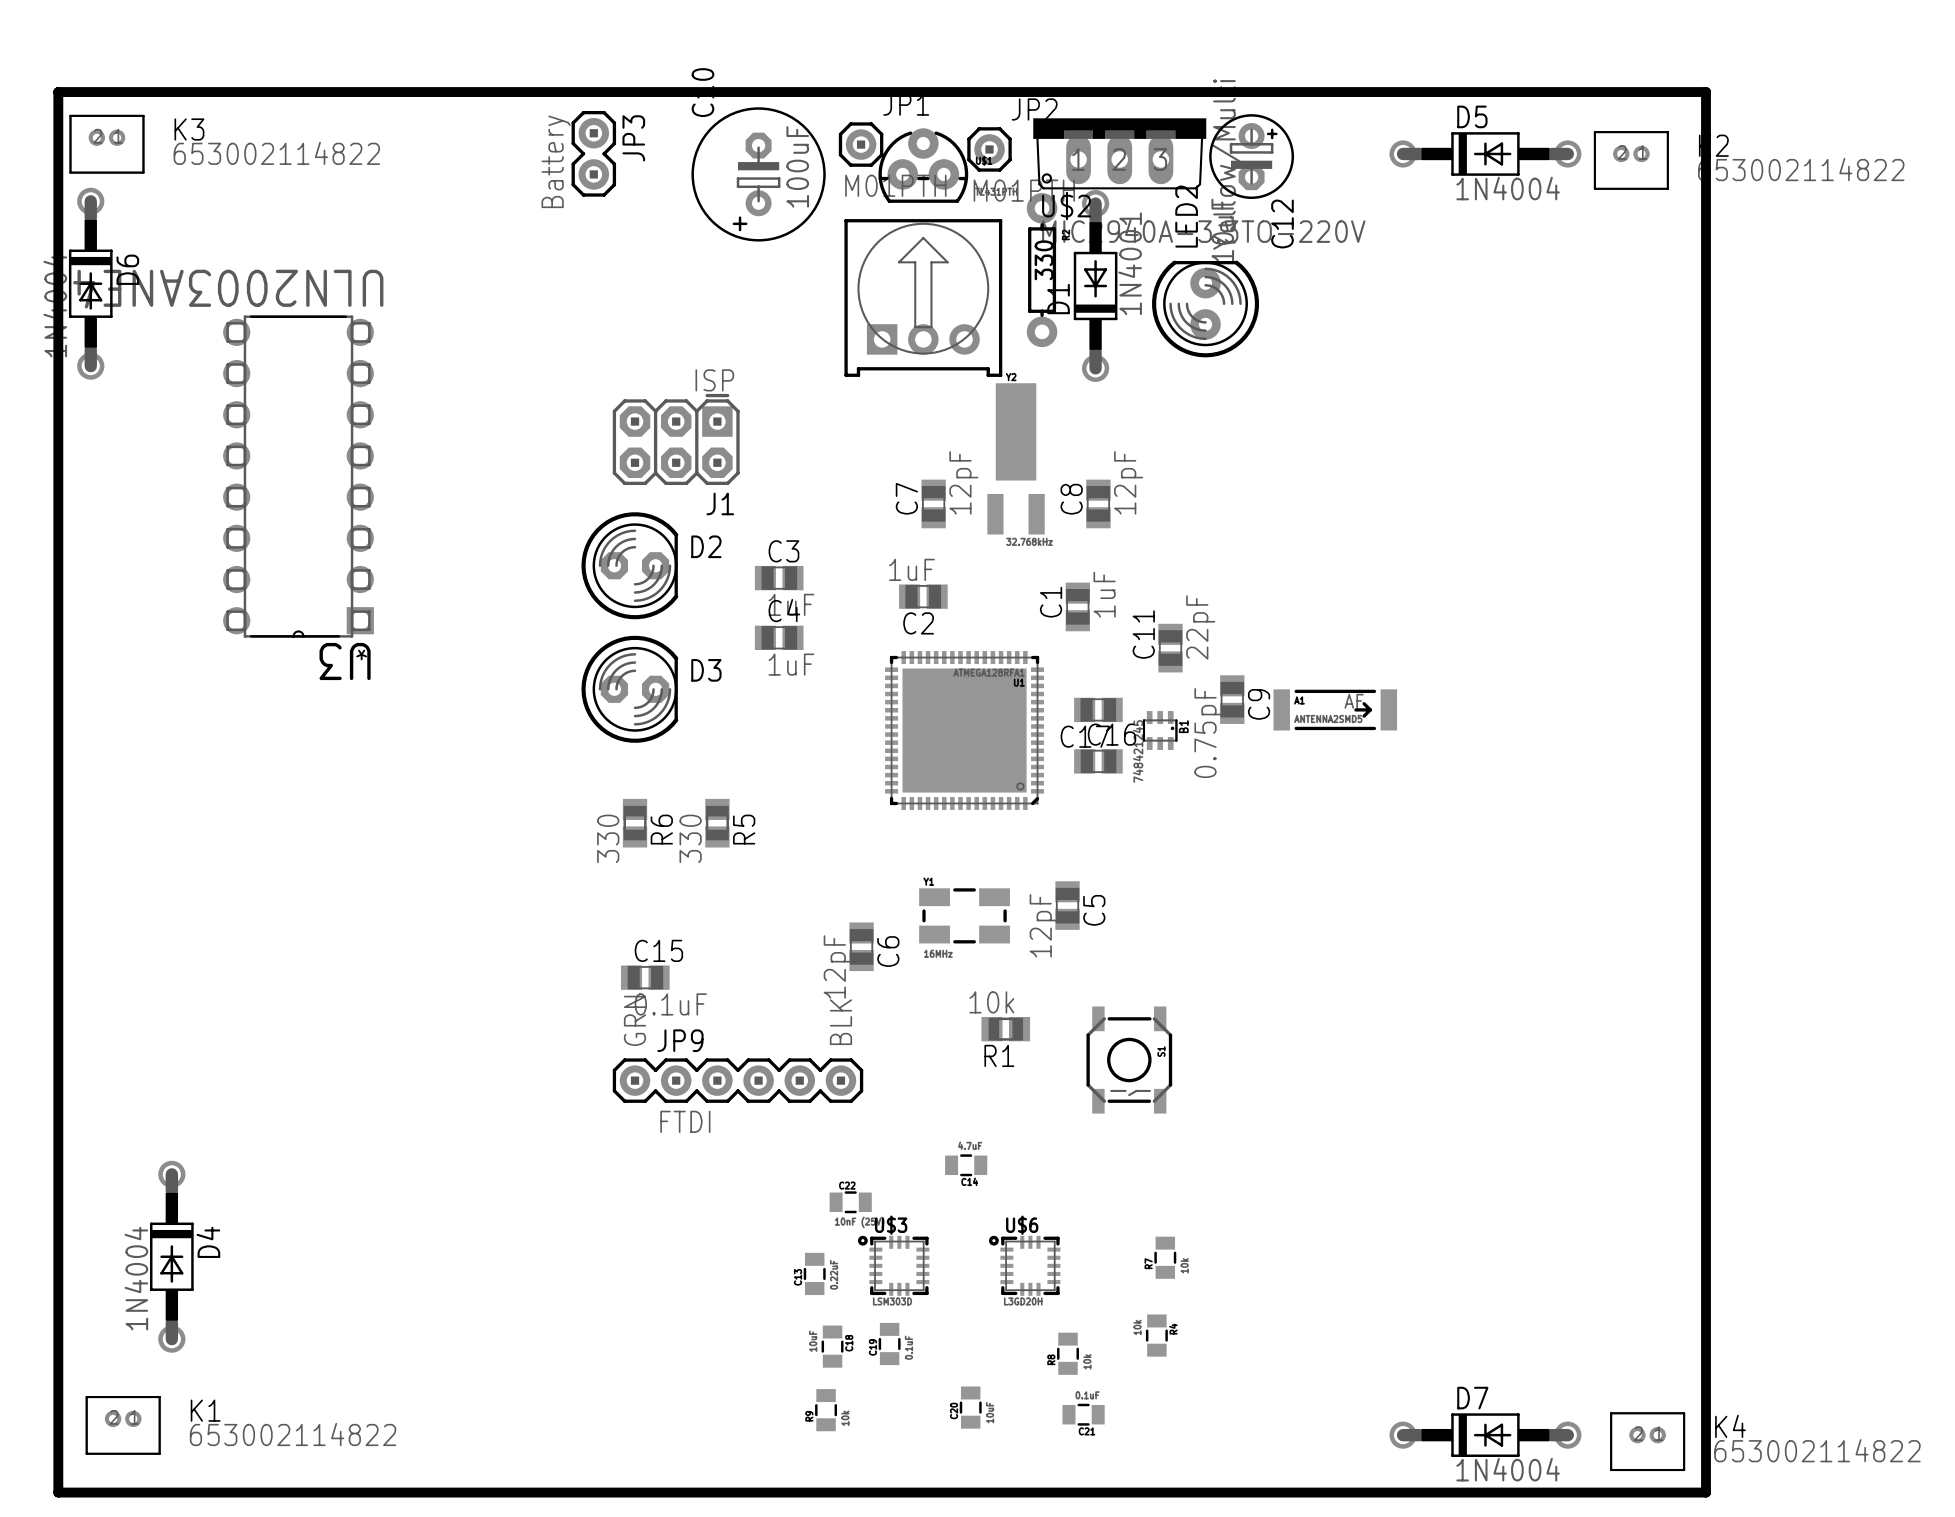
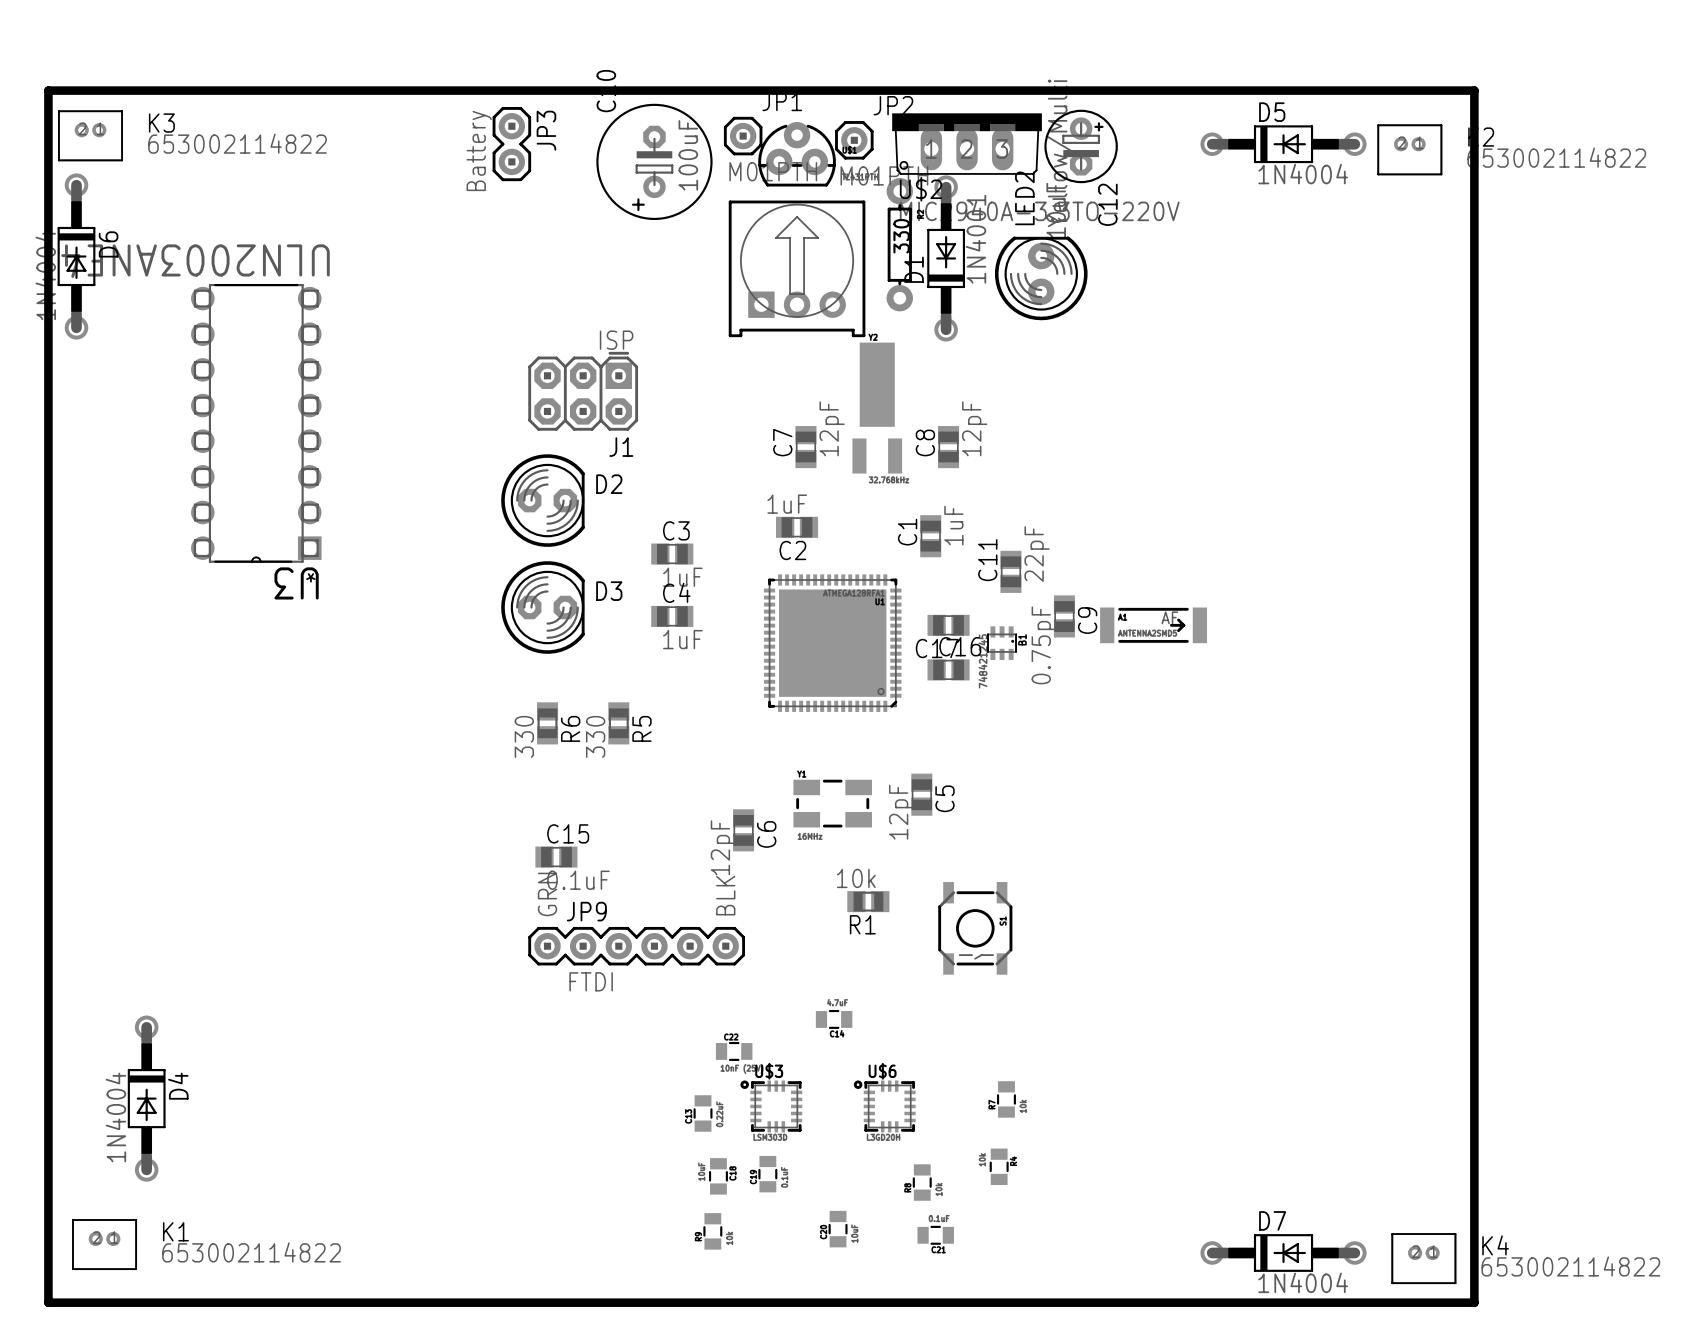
C3 position: (779, 578) -> (672, 554)
C4 position: (779, 637) -> (672, 616)

